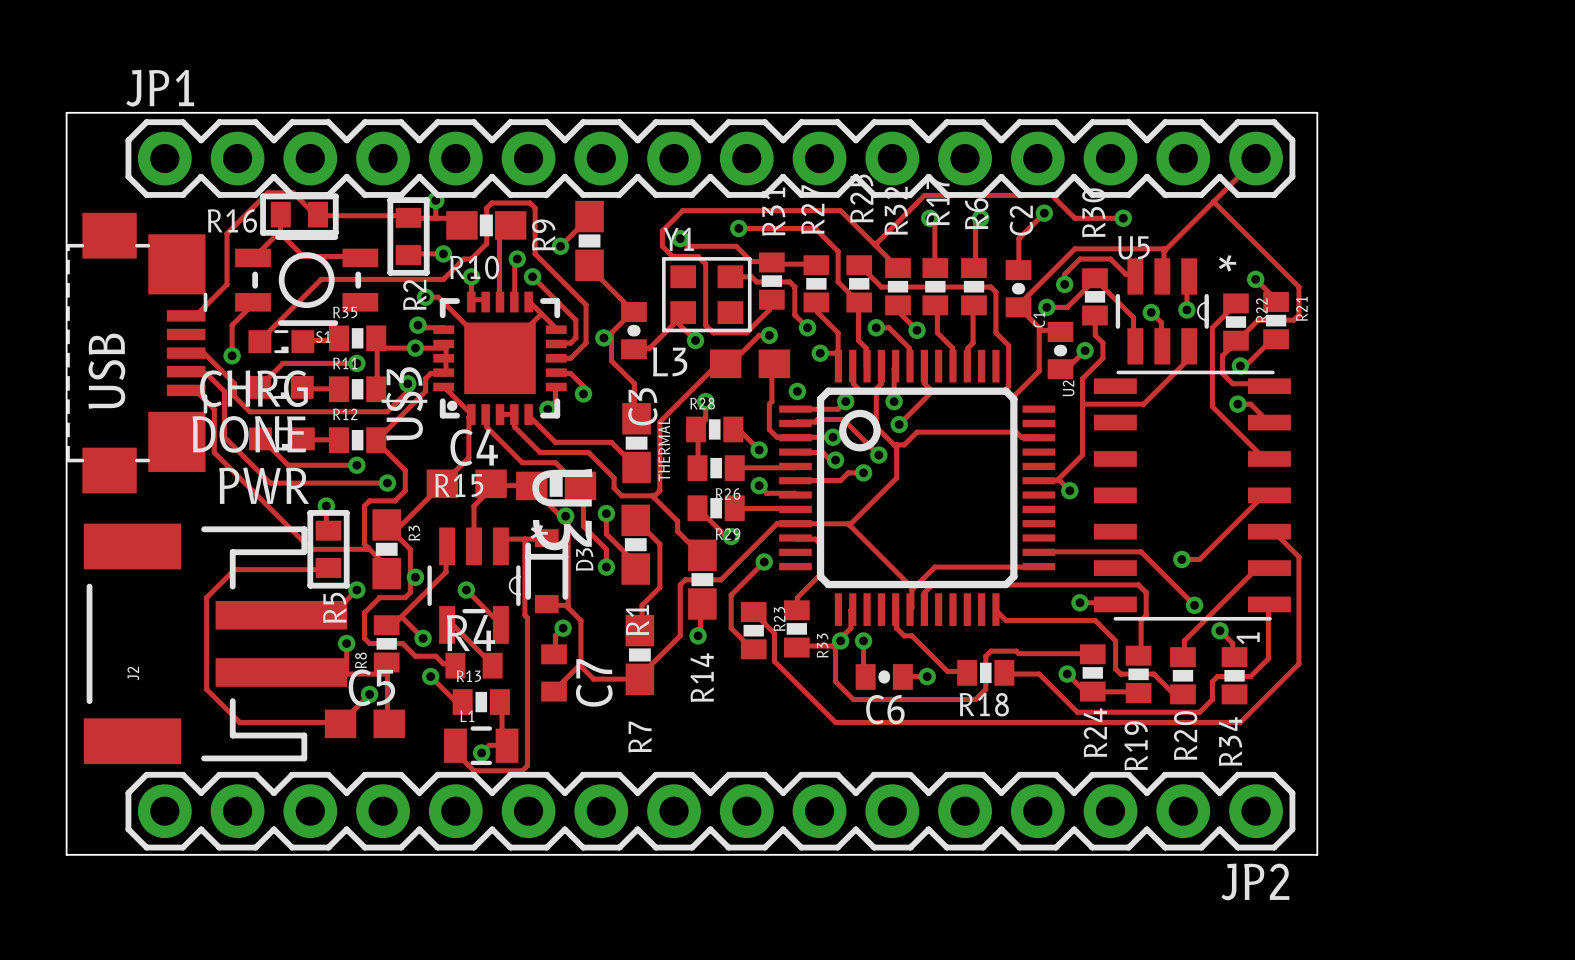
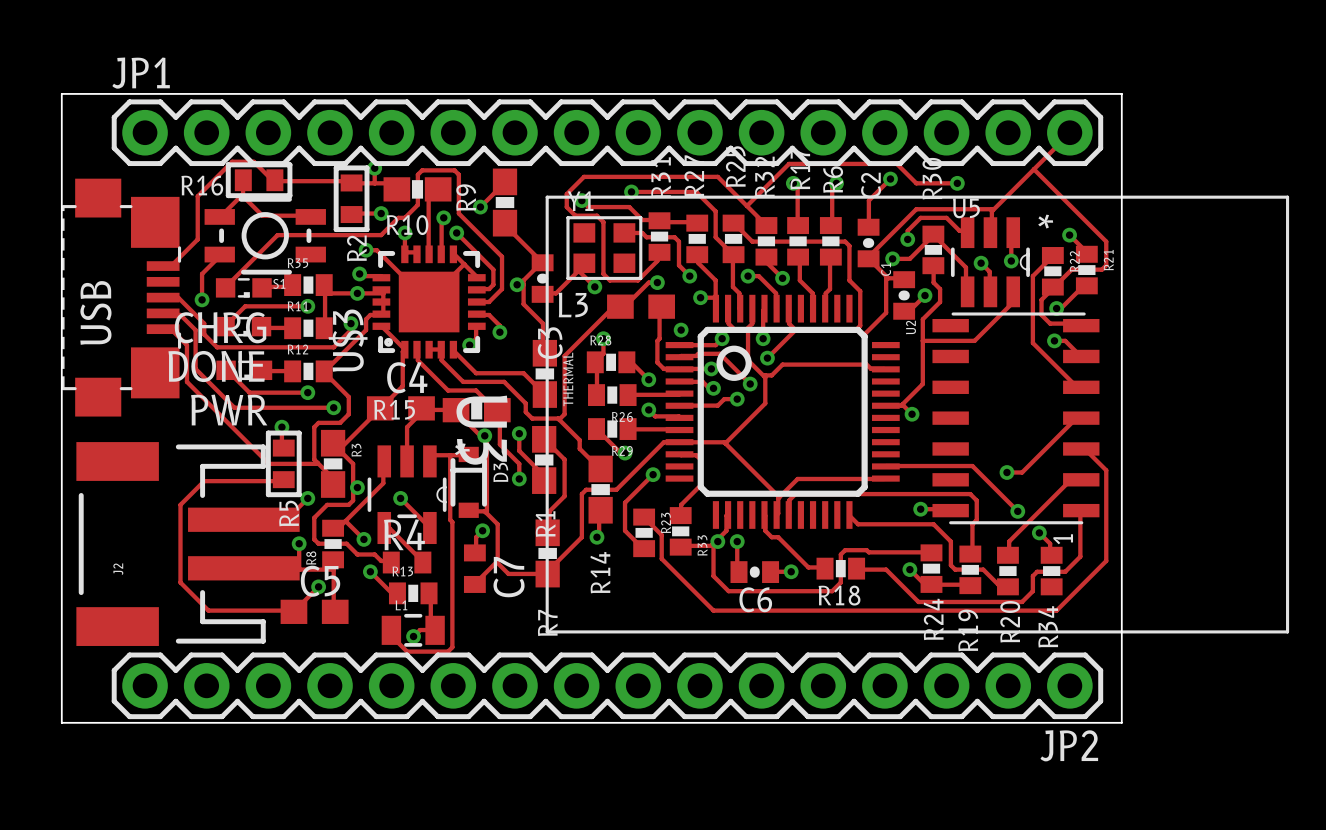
part: none -> (917, 414)

